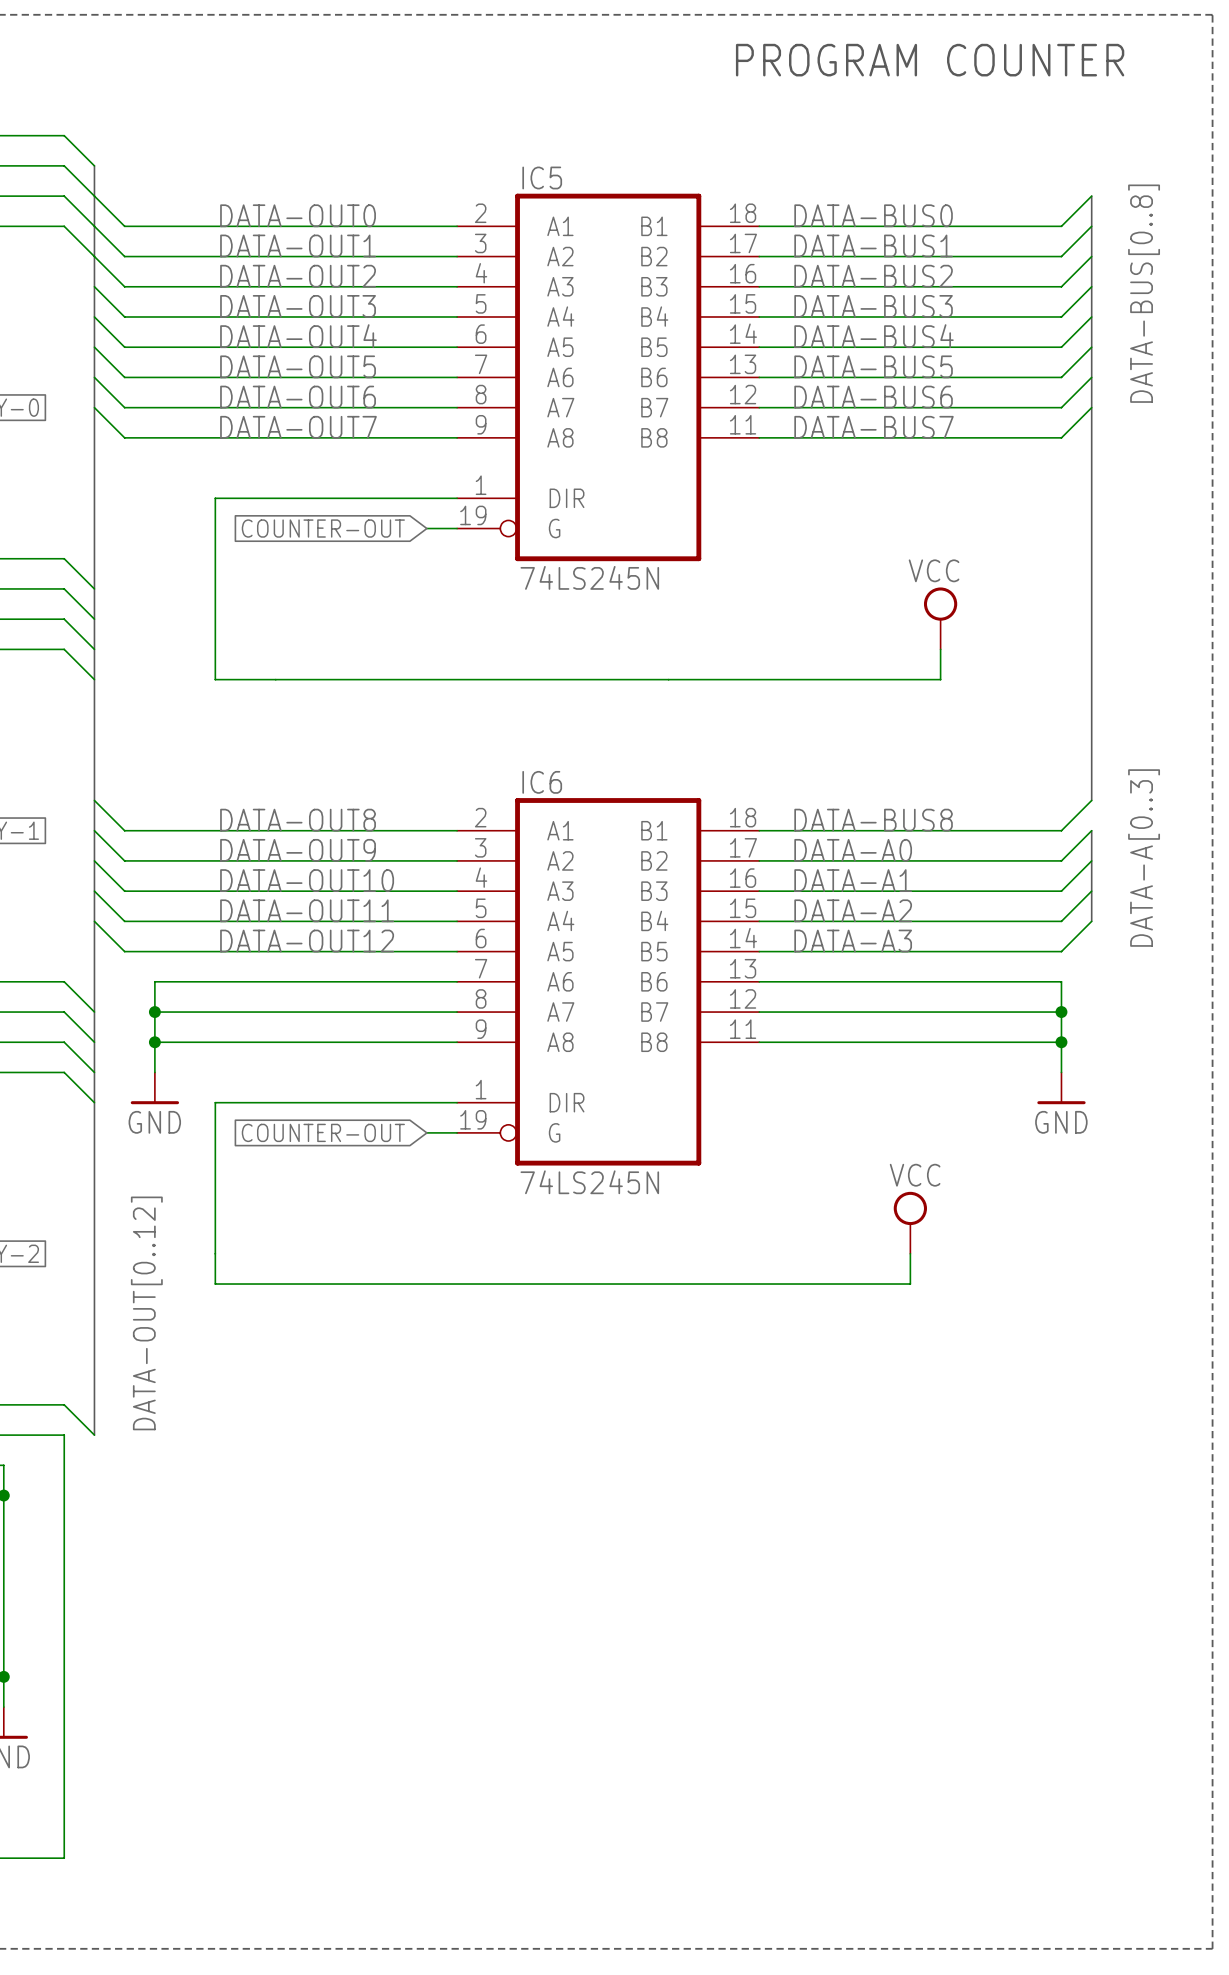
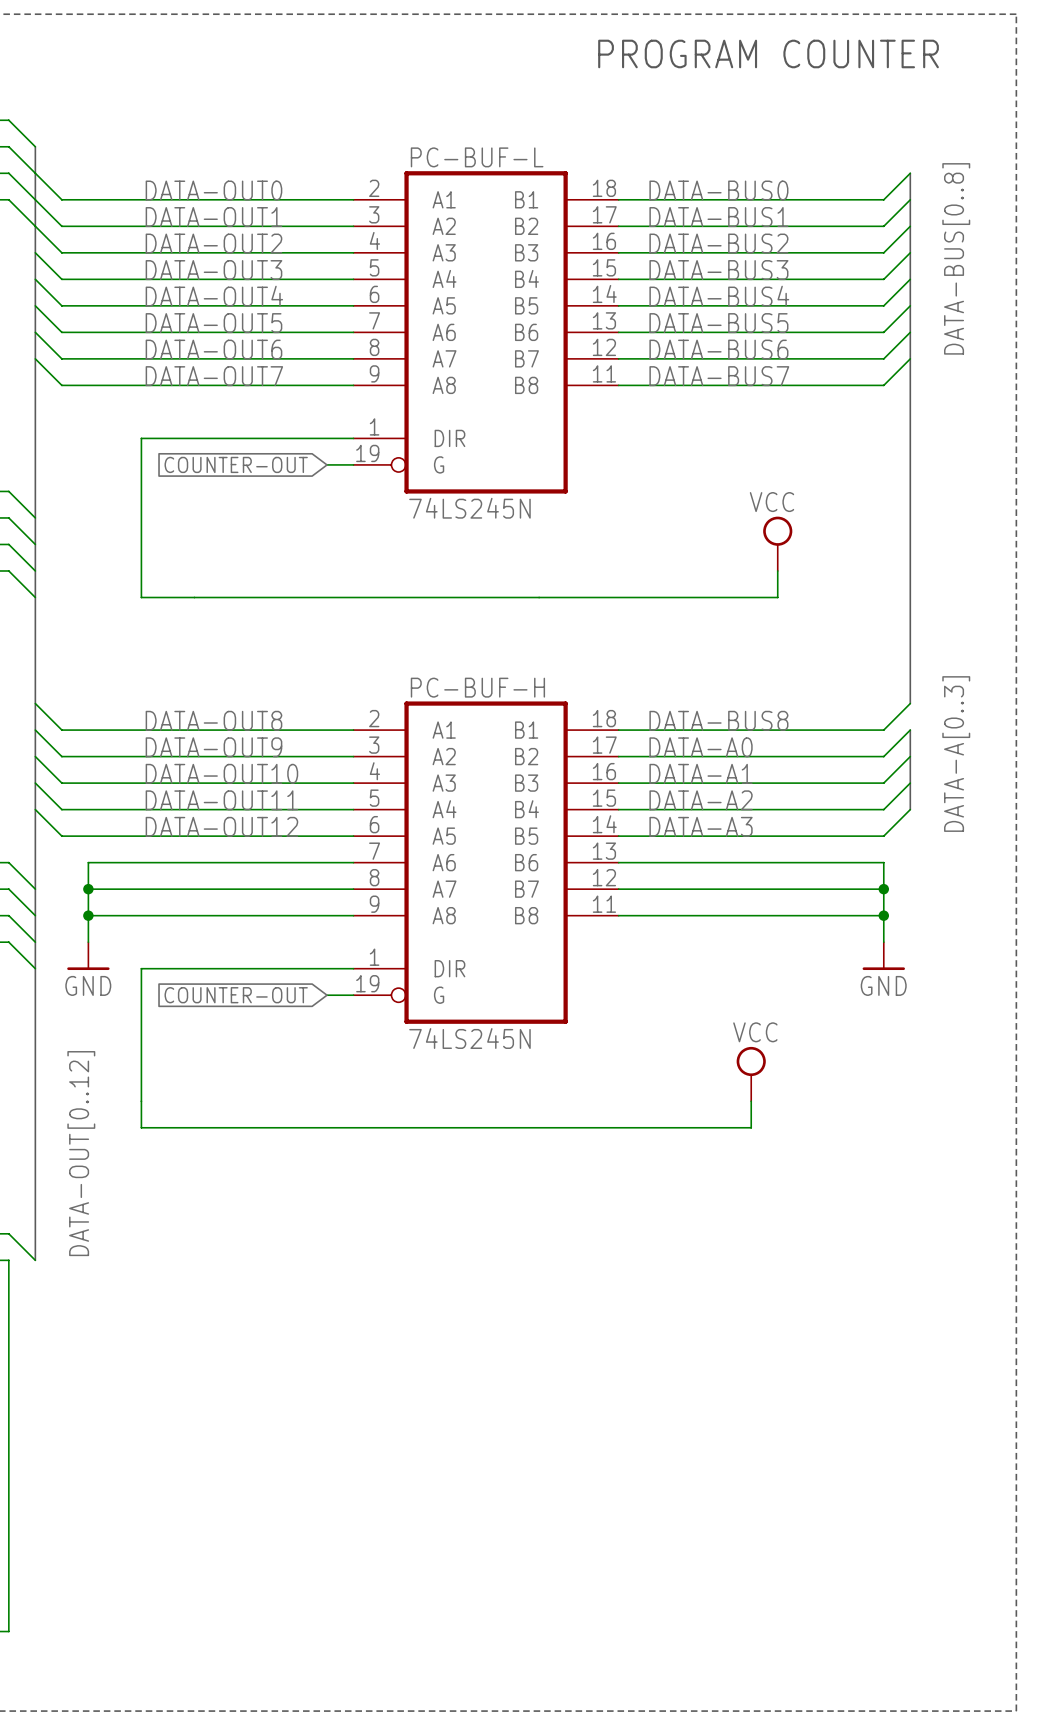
IC5 name: IC5 (542, 177) -> PC-BUF-L (477, 157)
IC6 name: IC6 (542, 782) -> PC-BUF-H (477, 687)

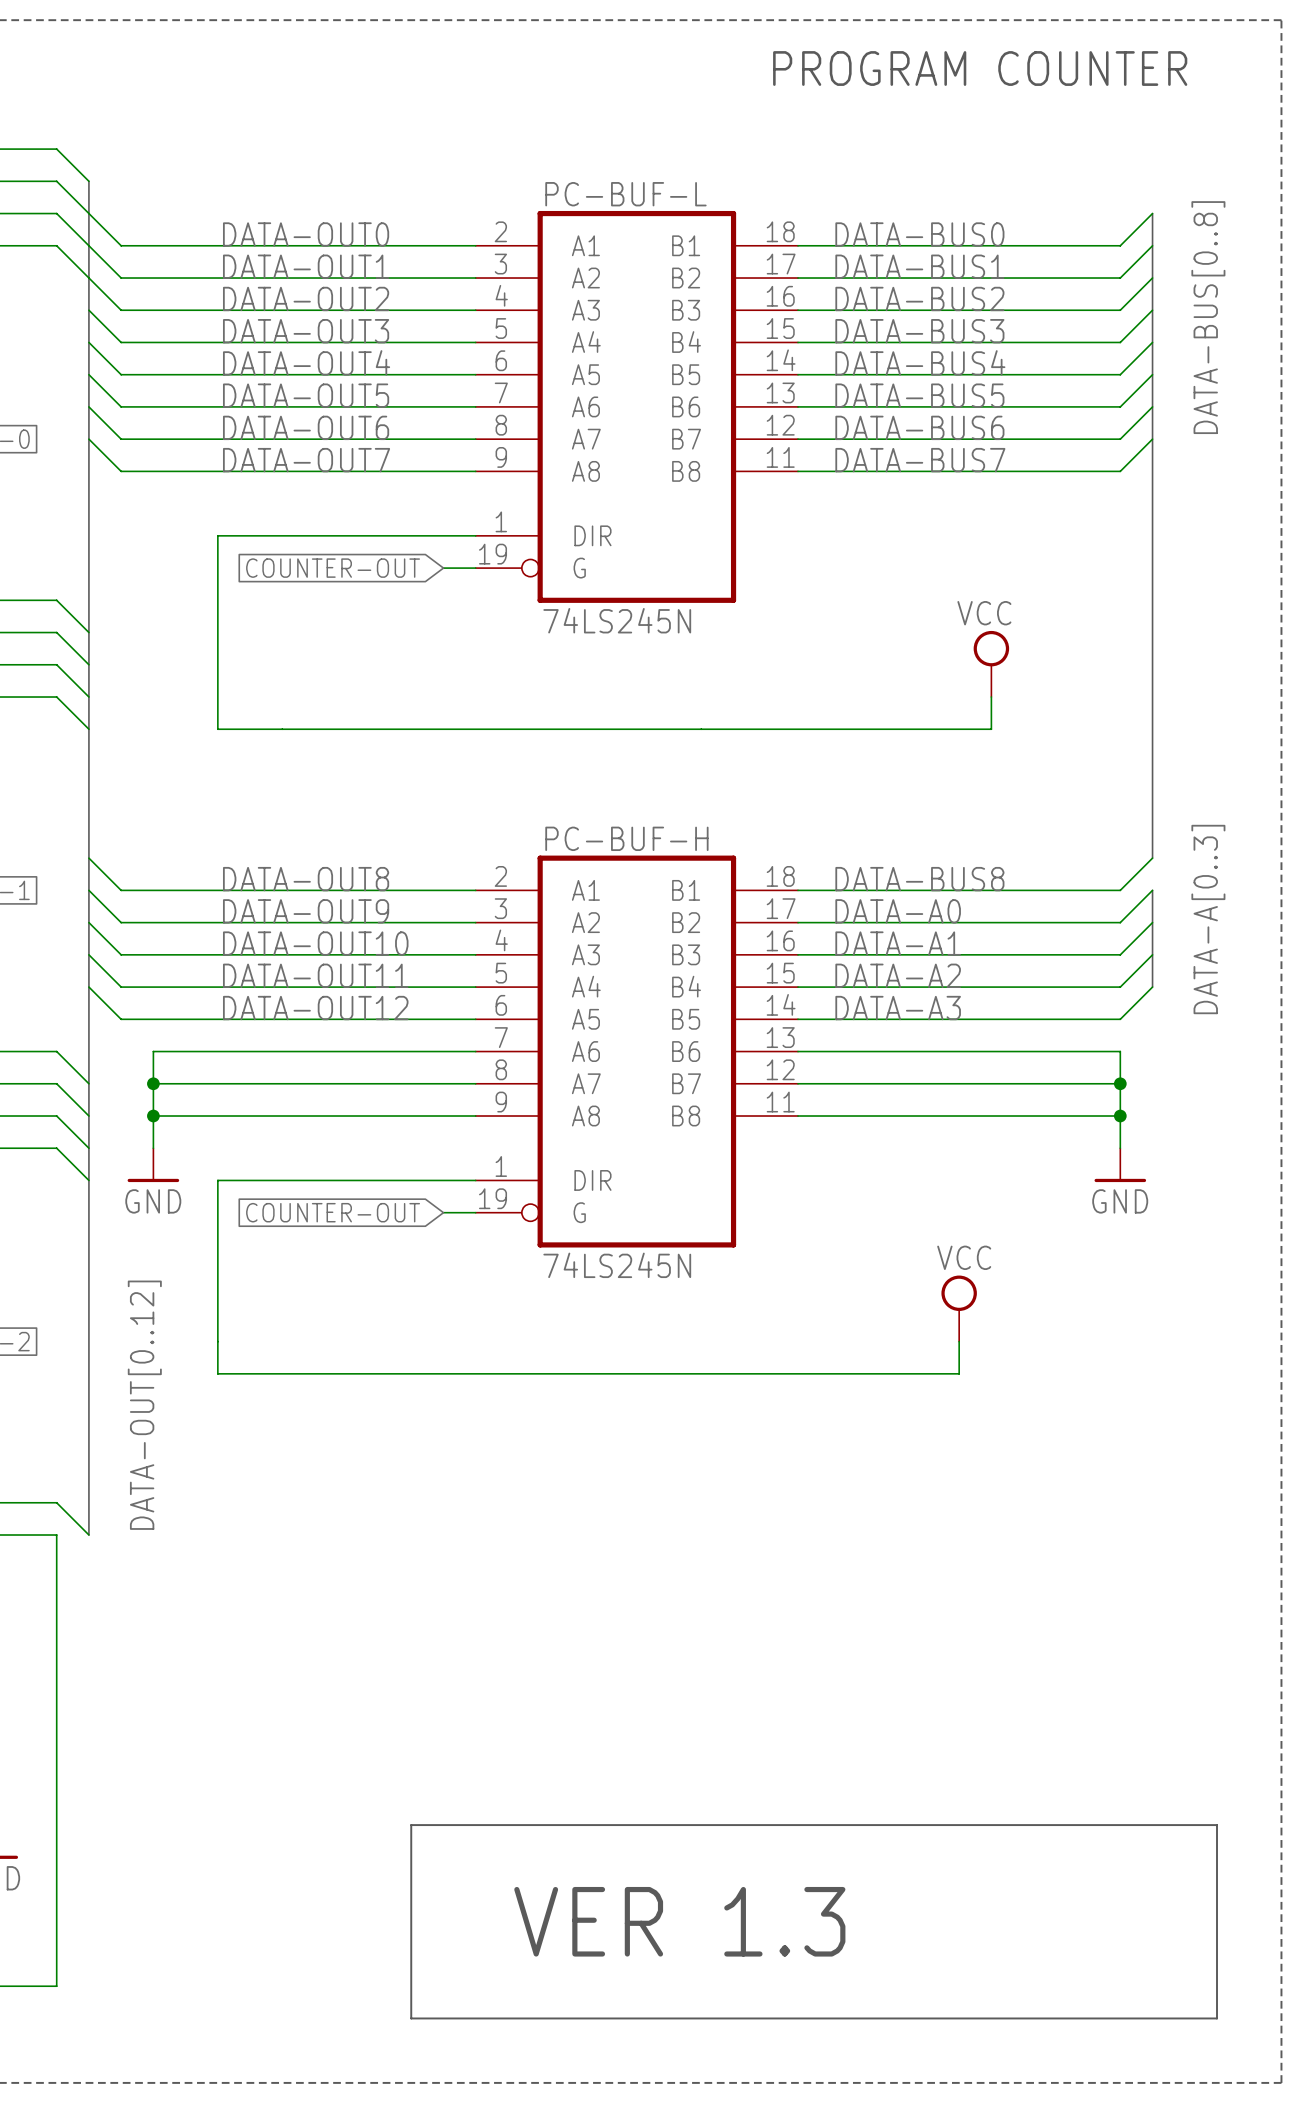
line: none -> (411, 1825) (411, 2018) (1217, 2018) (1217, 1825) (411, 1825)
text: none -> VER 1.3 (679, 1921)

